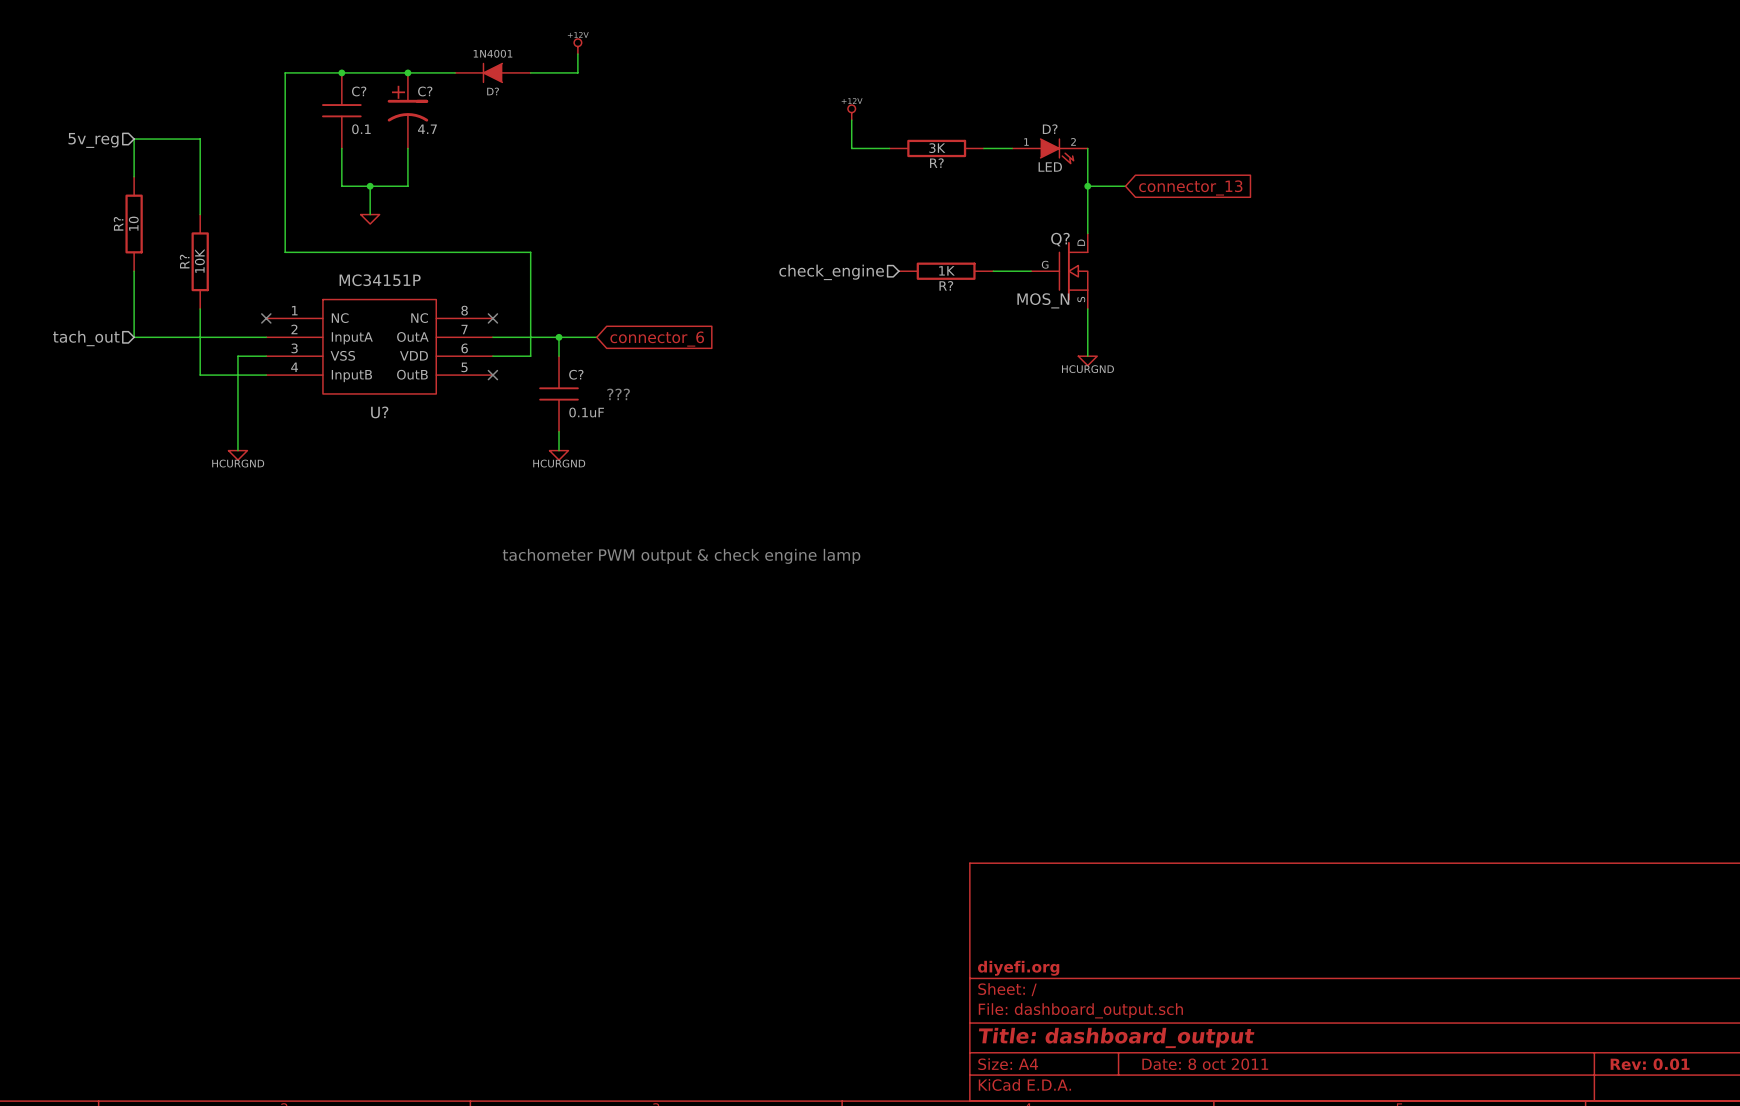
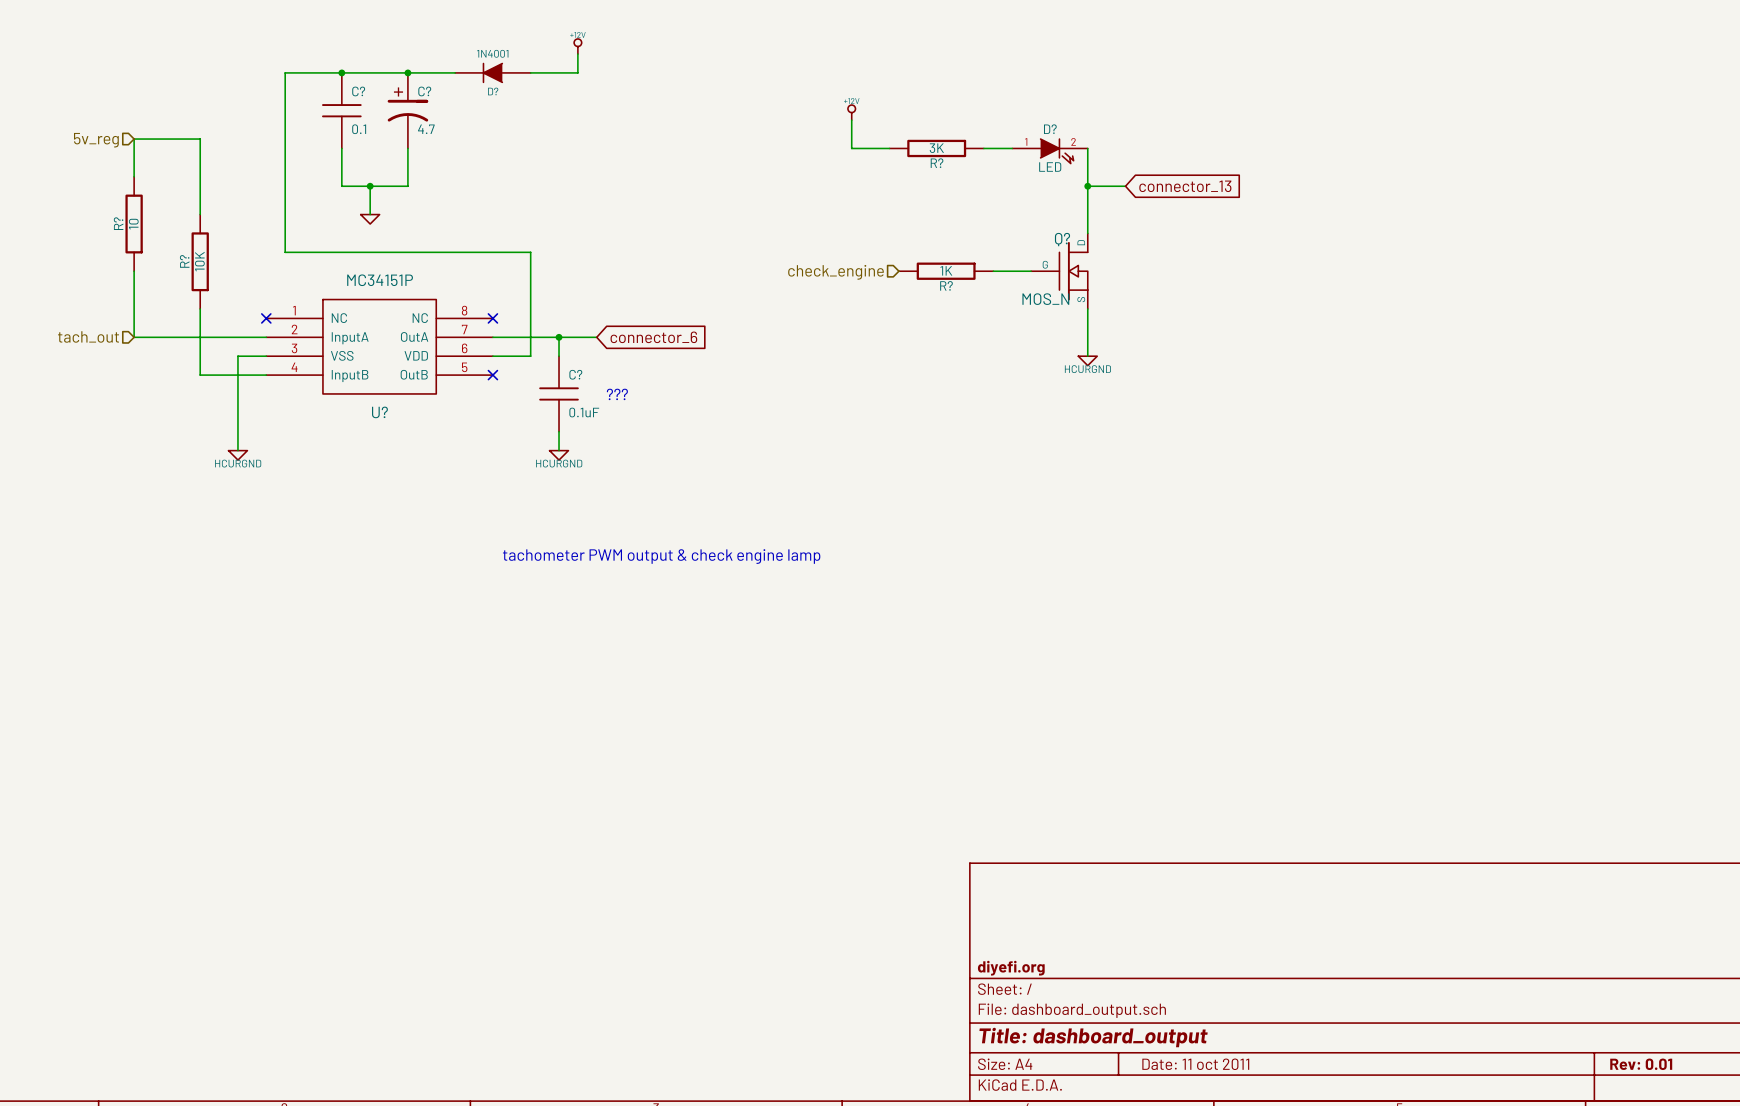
title block: Date: 8 oct 2011 (1205, 1064) -> Date: 11 oct 2011 (1195, 1064)

